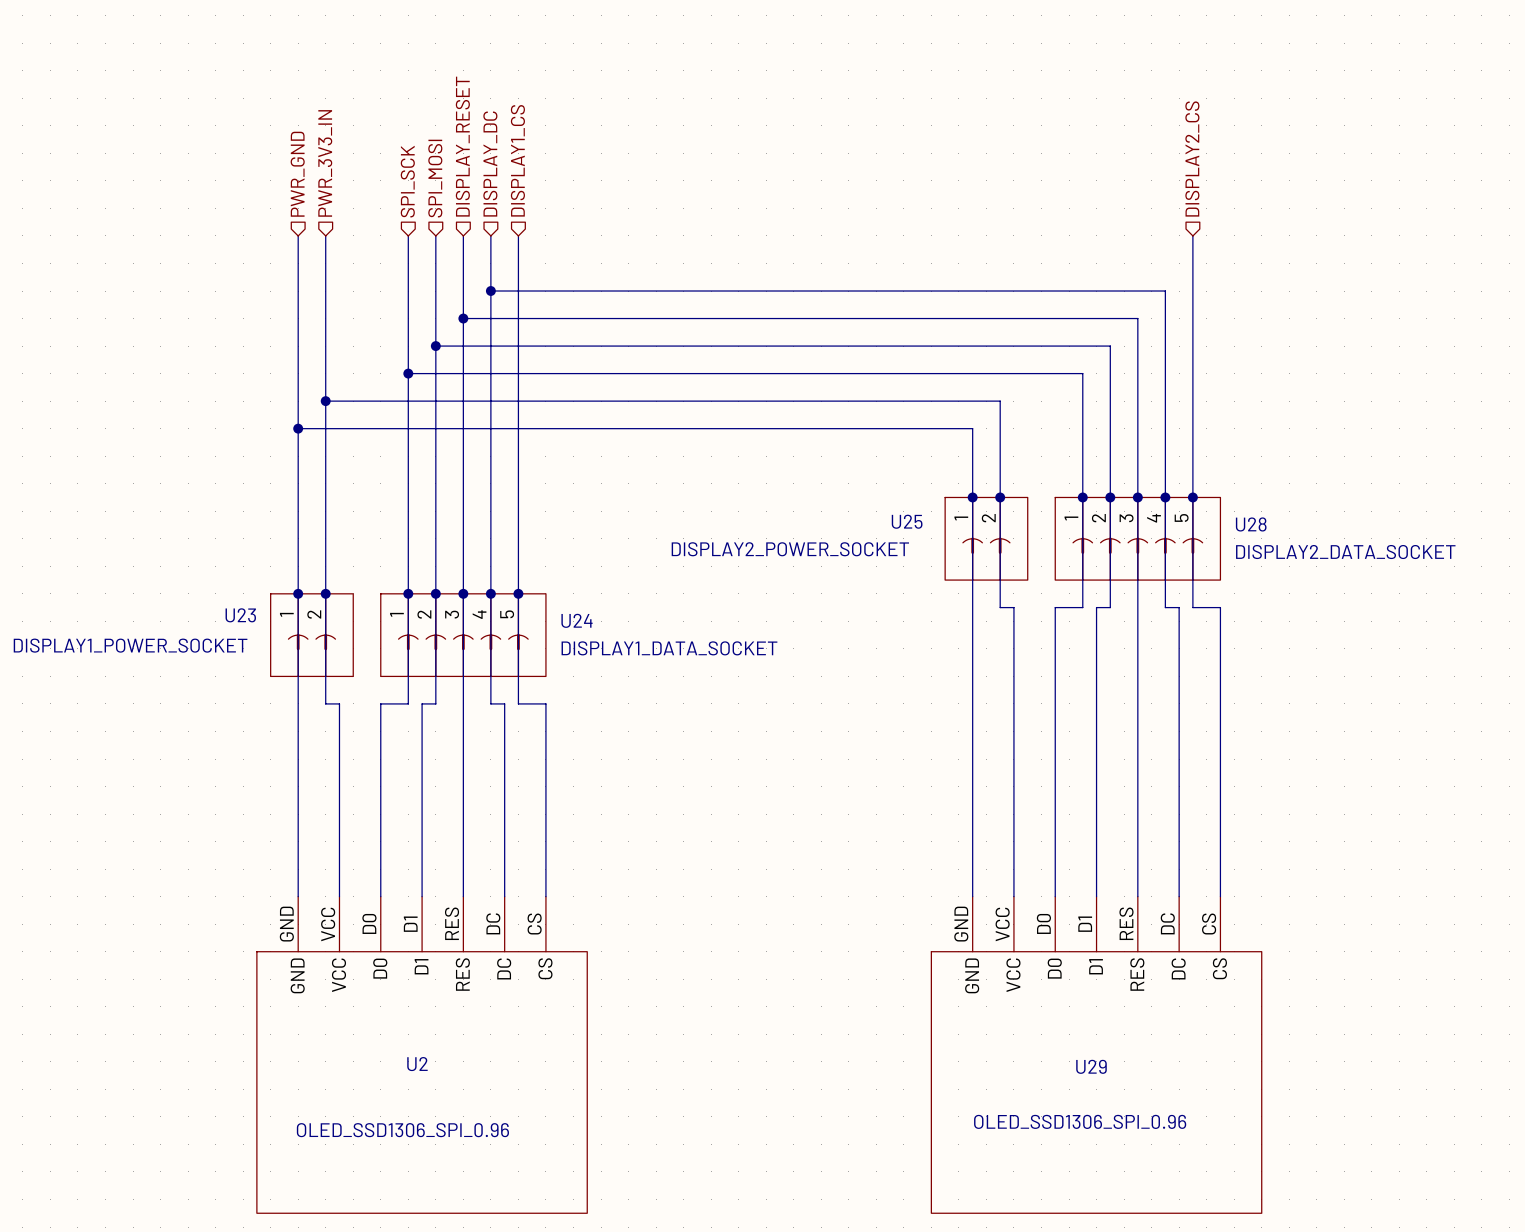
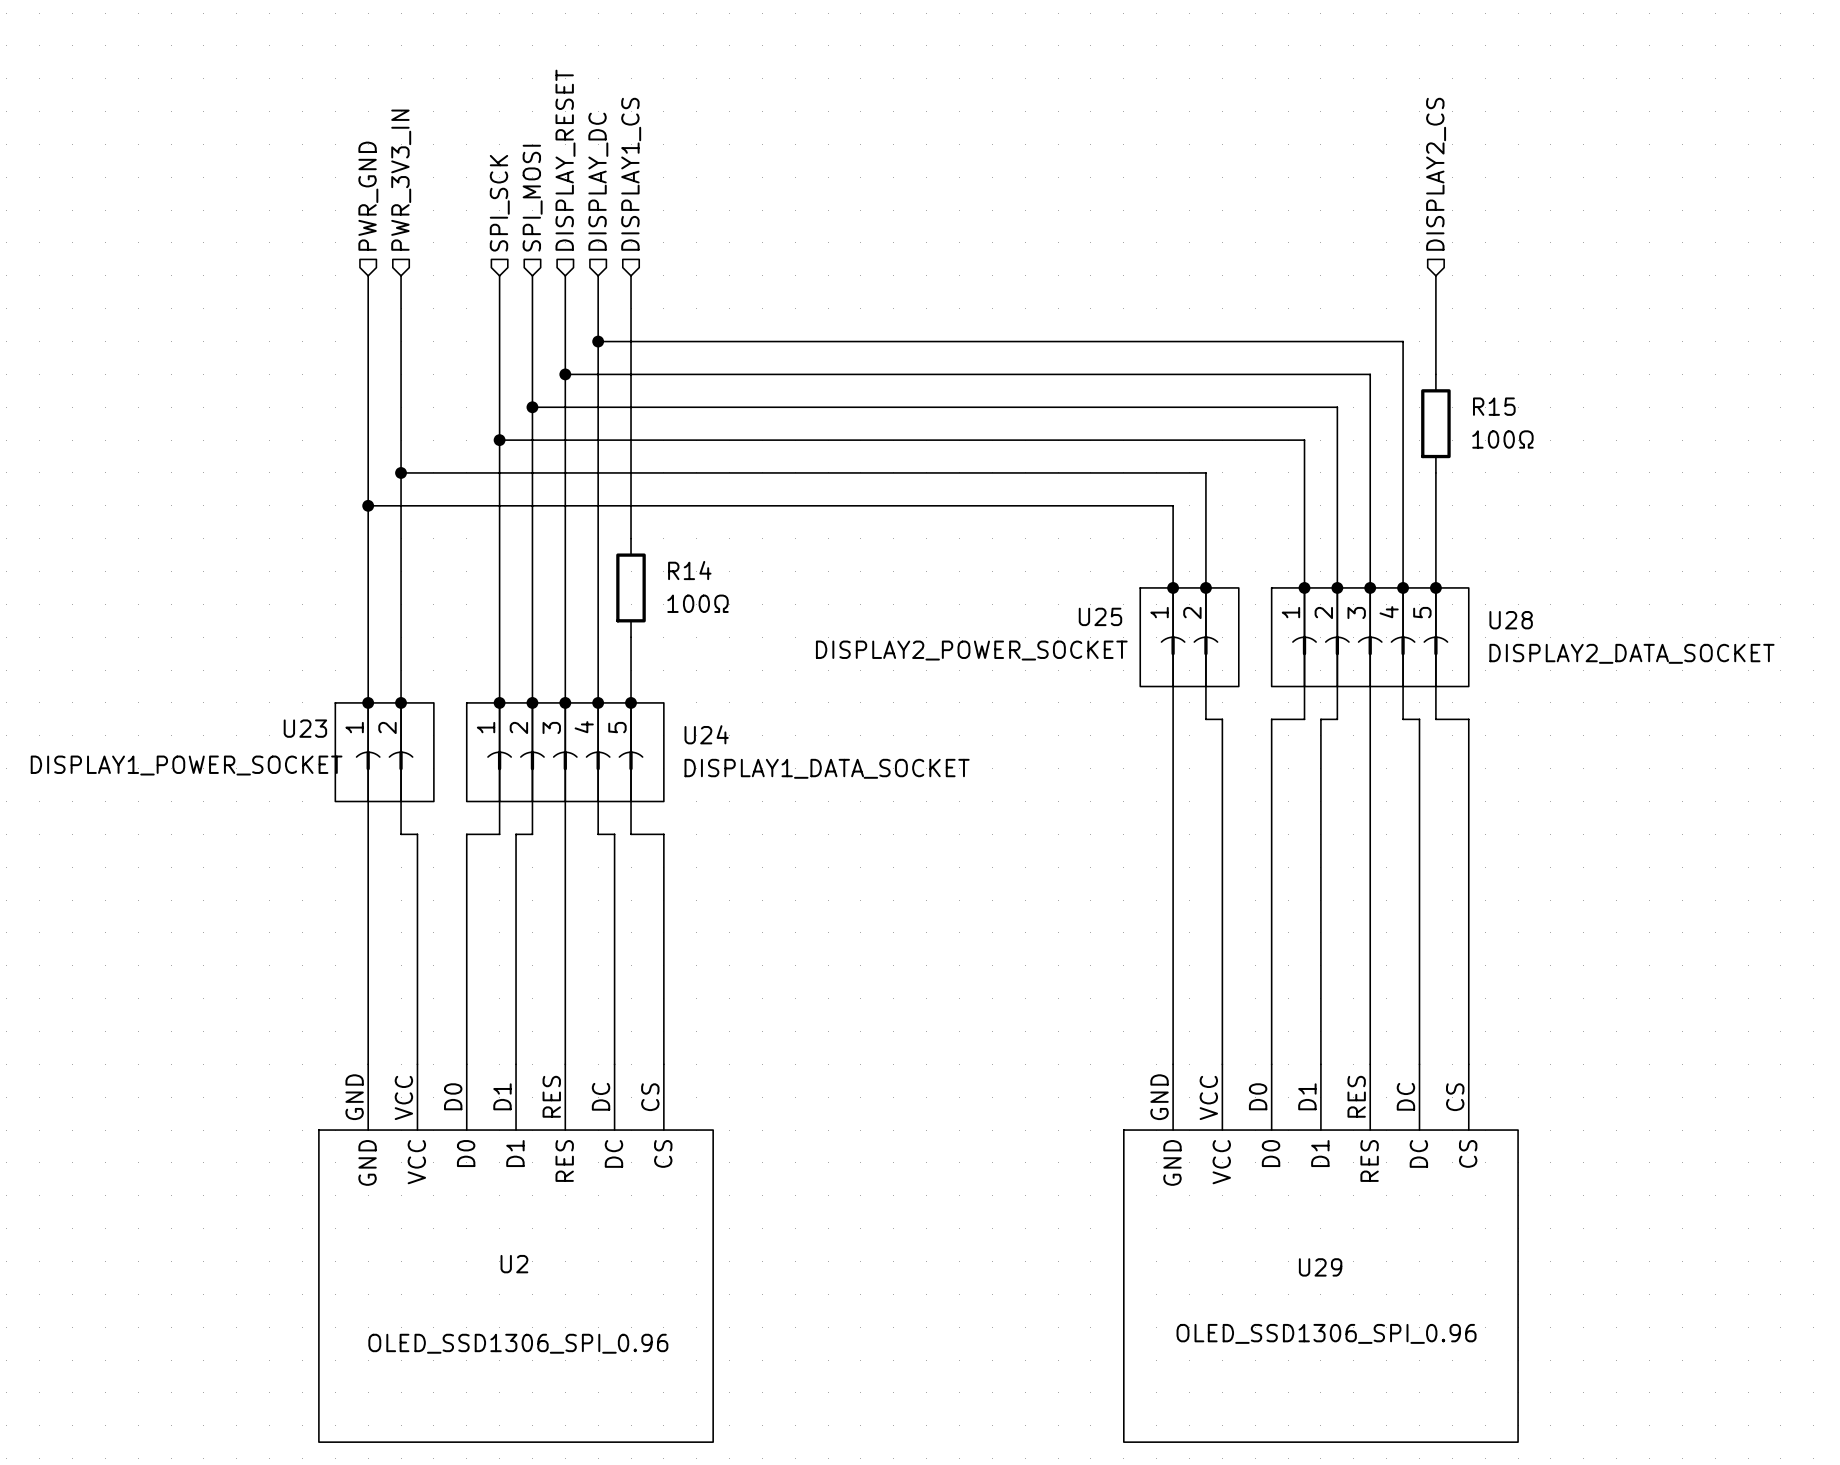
wire: (1192, 318) (1192, 401) -> none
R15: none -> 100Ω (1435, 423)
wire: (518, 456) (518, 538) -> none
R14: none -> 100Ω (631, 587)

